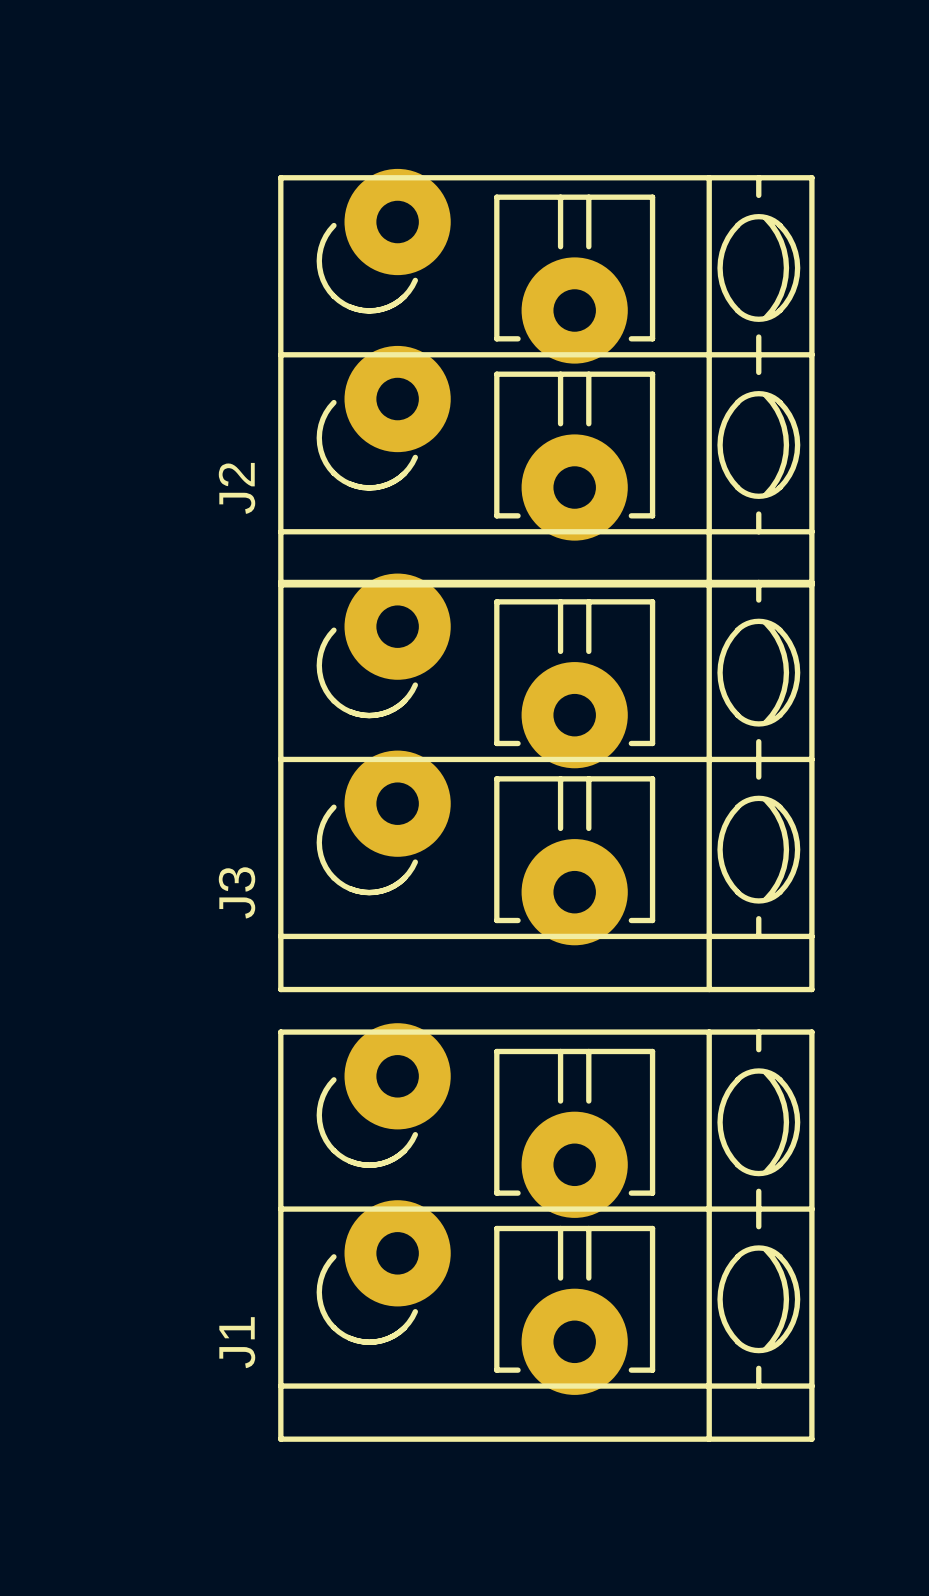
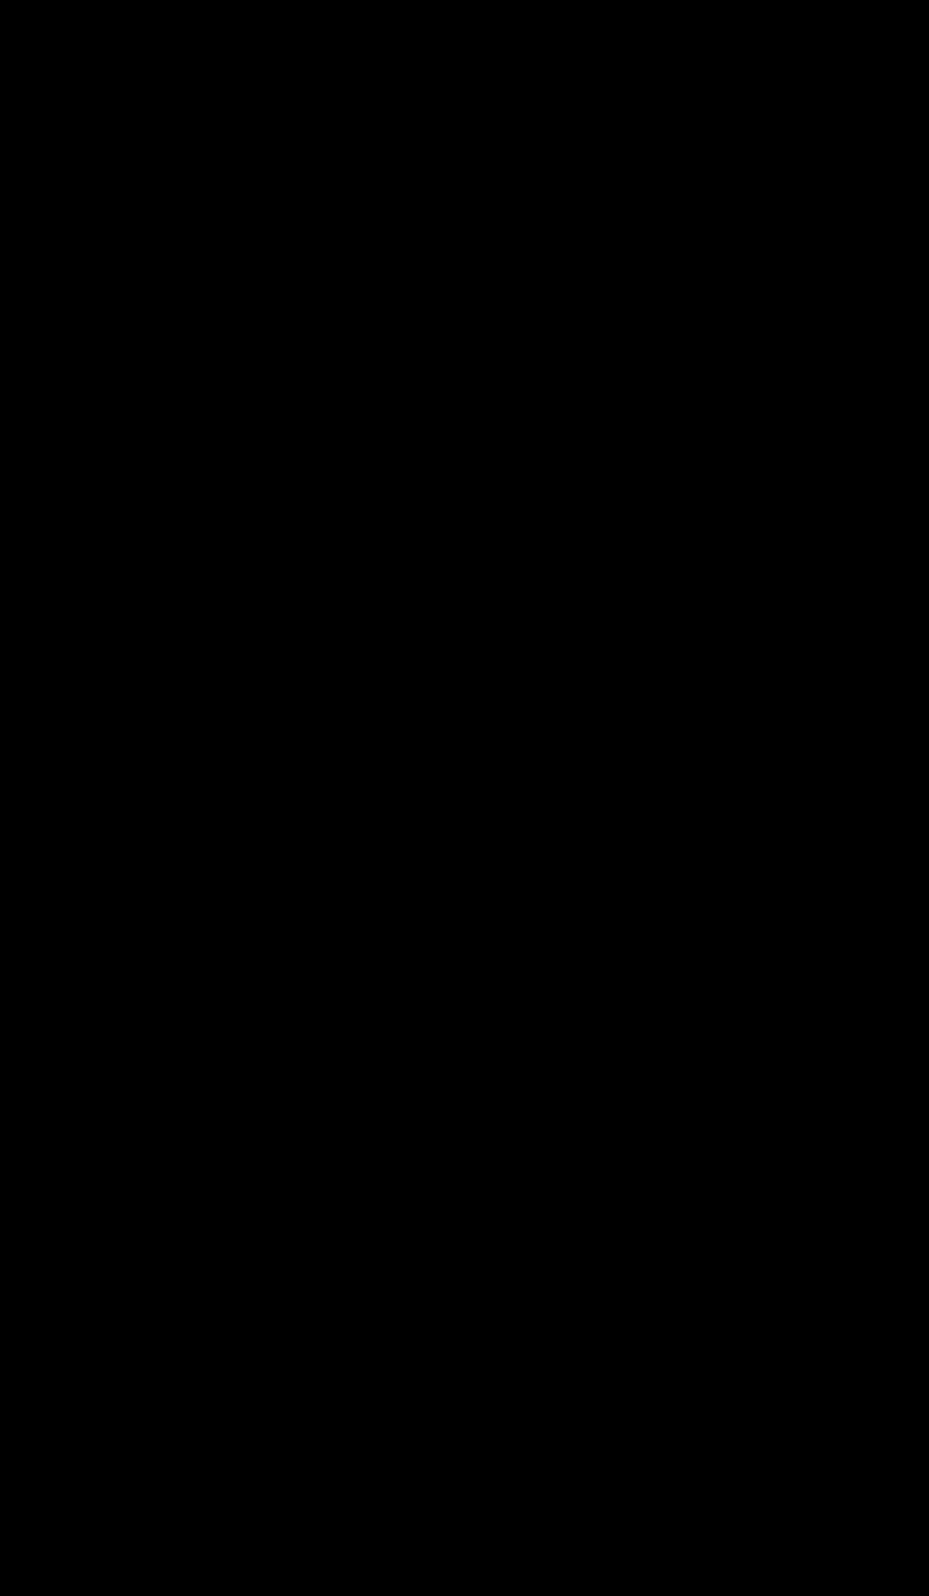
J2: (546, 378) -> none
J3: (546, 782) -> none
J1: (546, 1232) -> none

